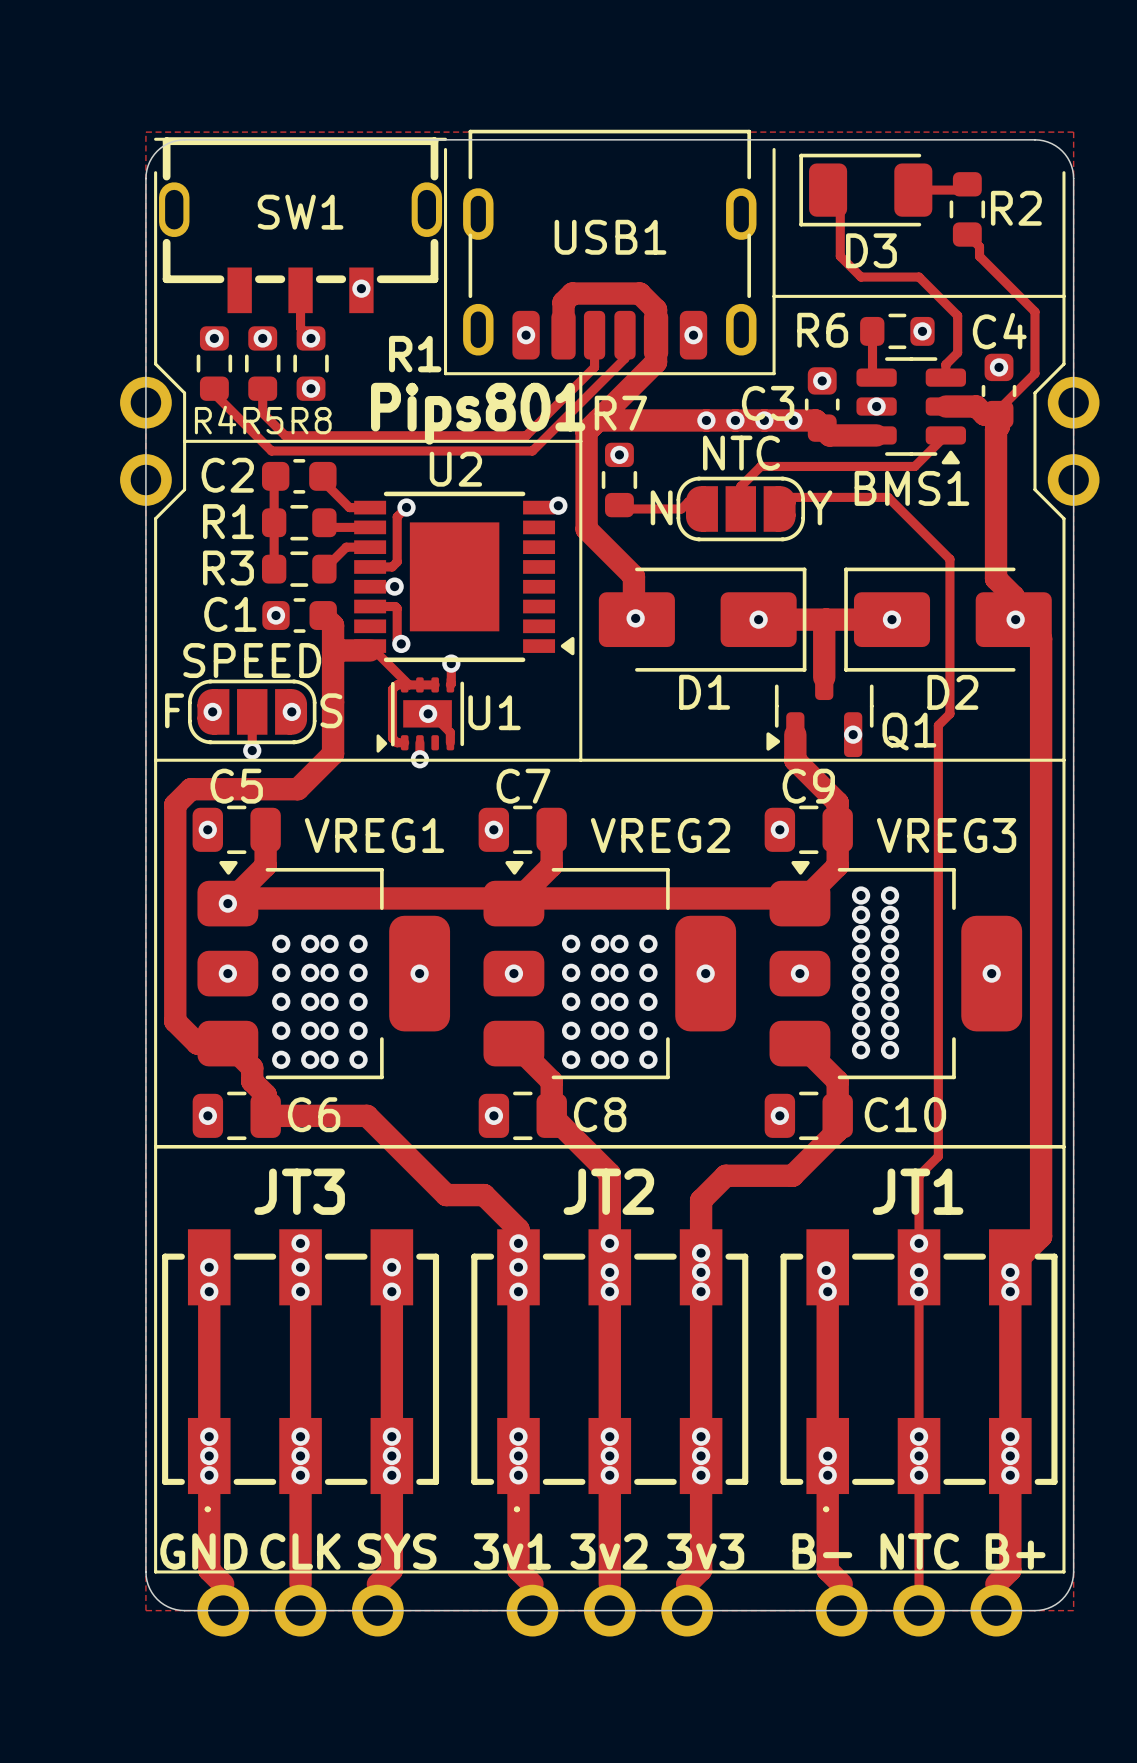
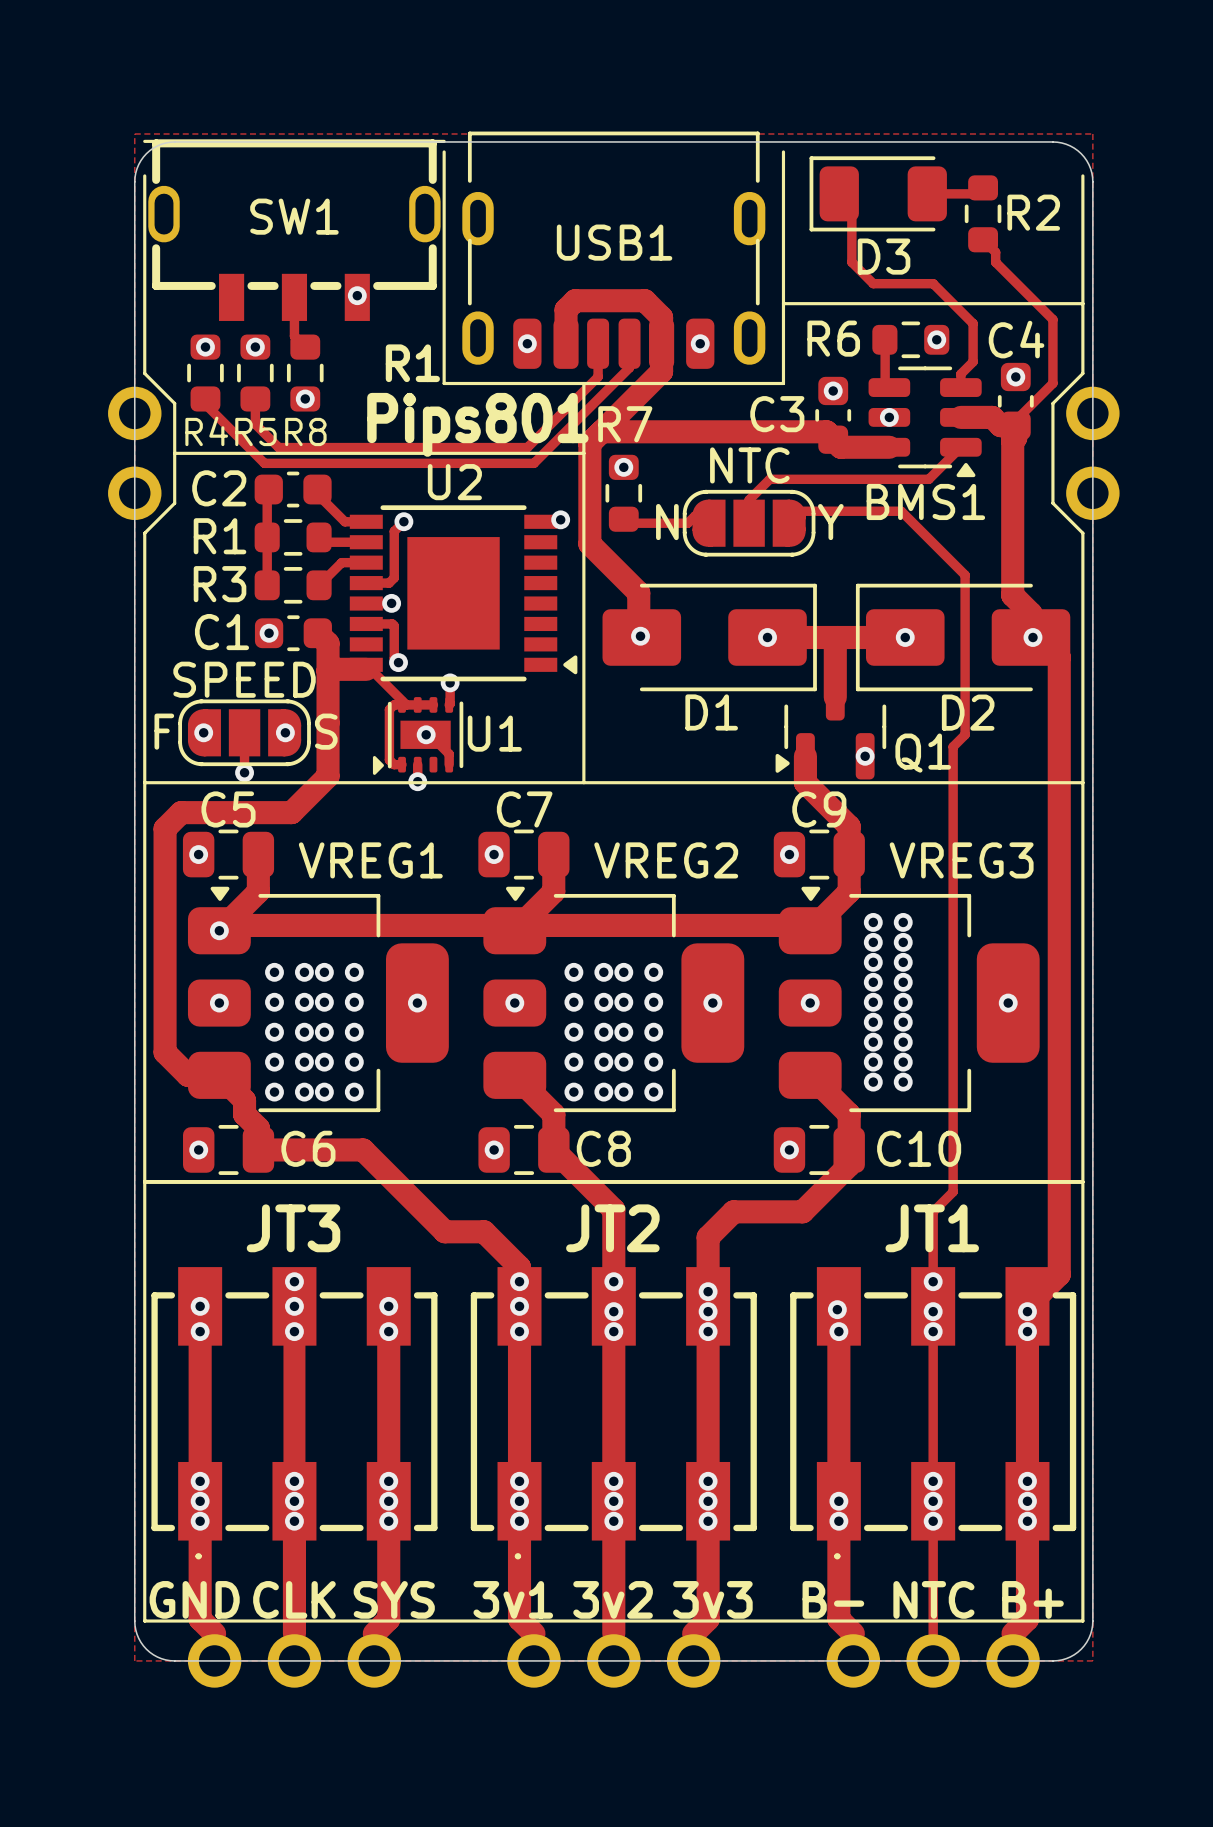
via: (311, 338) -> none
via: (706, 420) -> none
via: (735, 420) -> none
via: (764, 420) -> none
via: (793, 420) -> none

